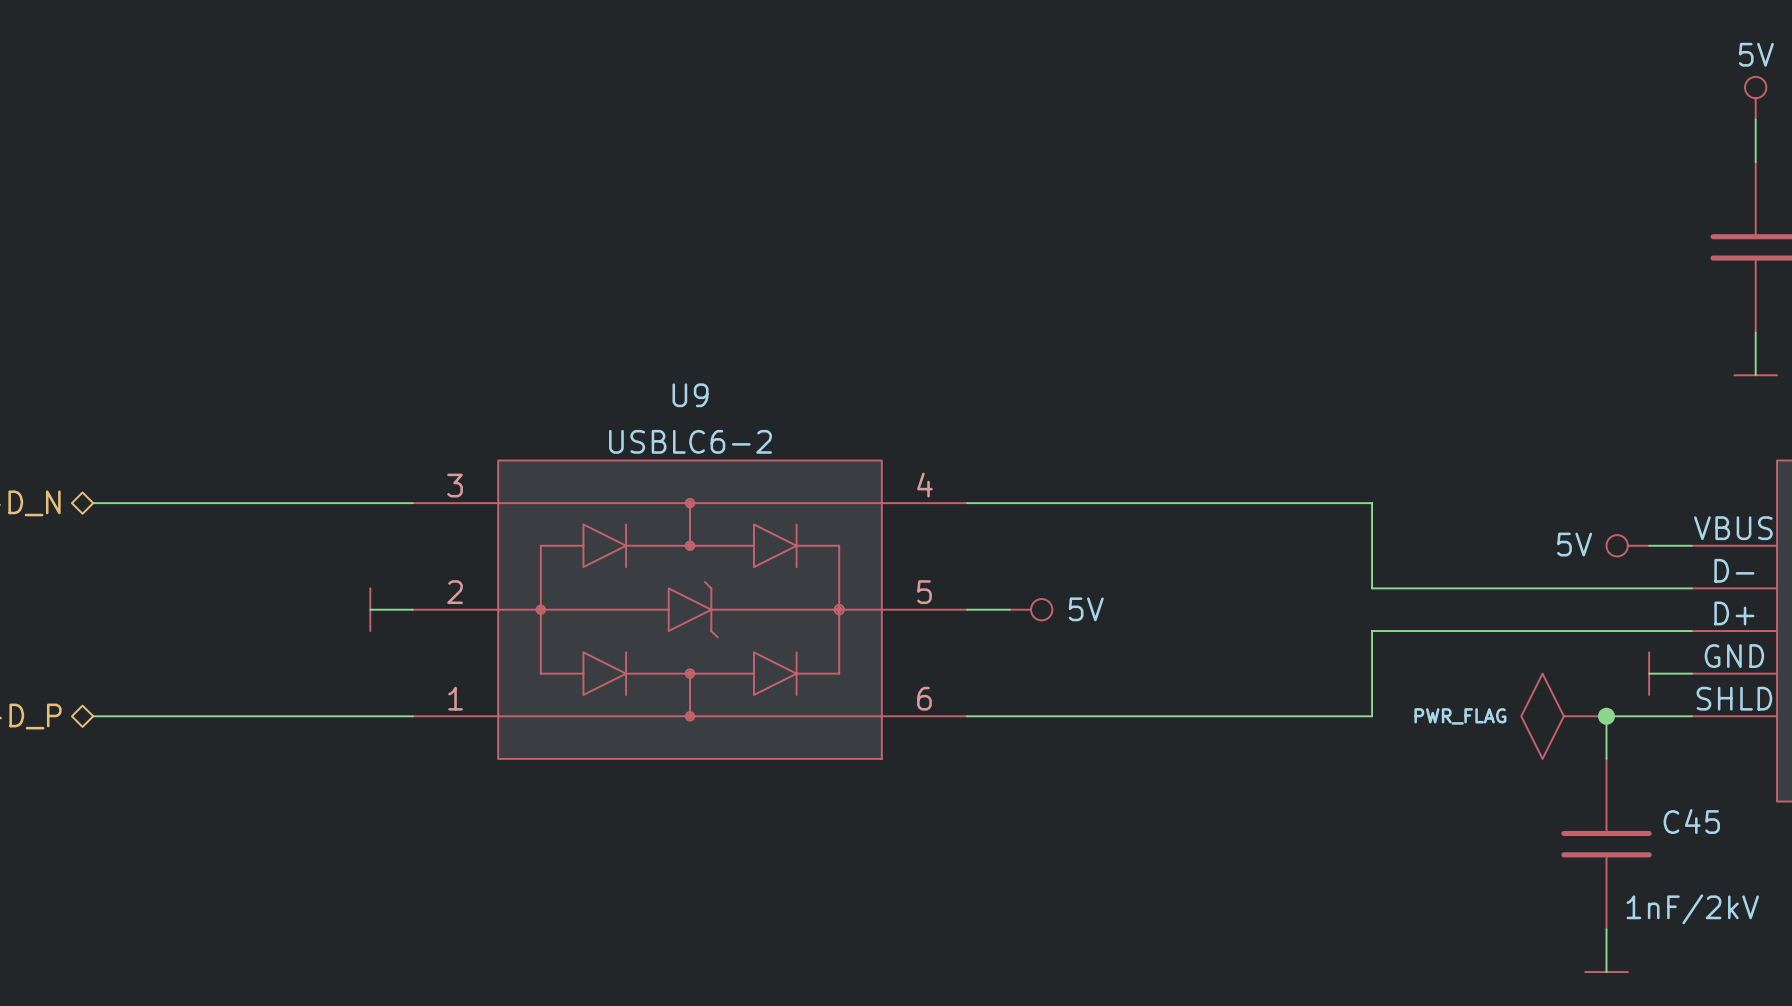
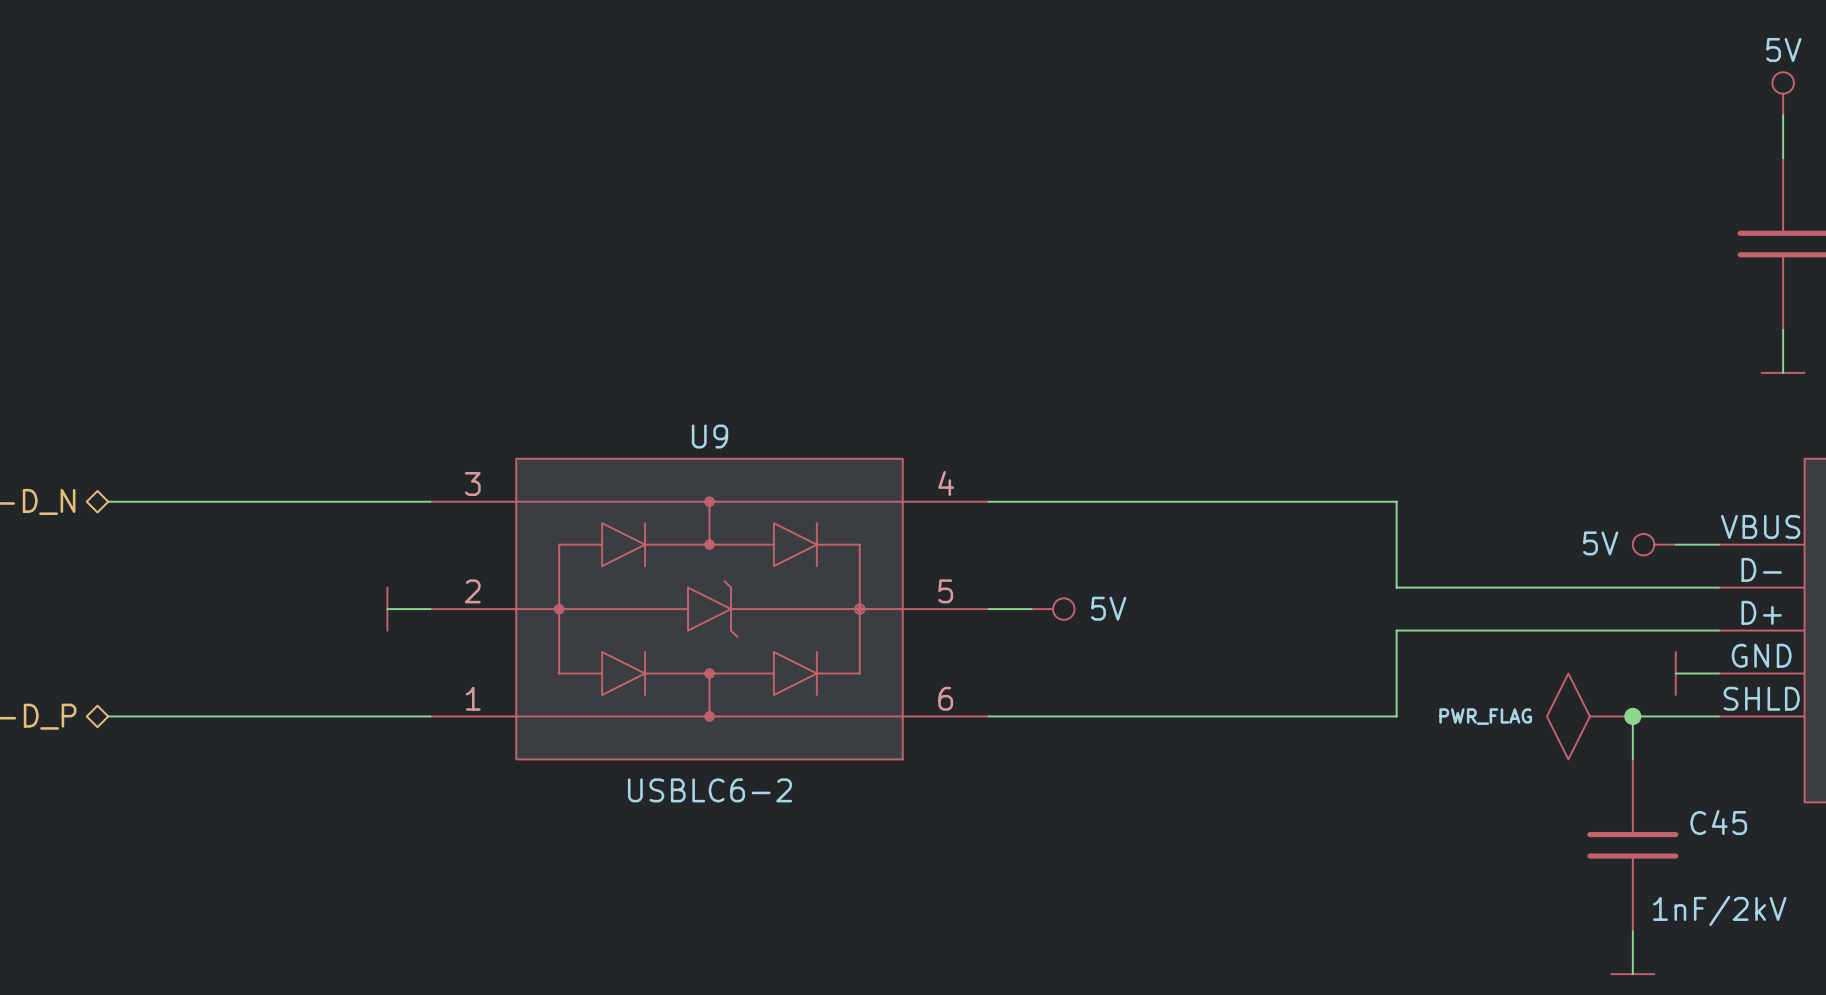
U9 name position: U9 (690, 395) -> U9 (710, 436)
U9 value position: USBLC6-2 (690, 441) -> USBLC6-2 (710, 790)

